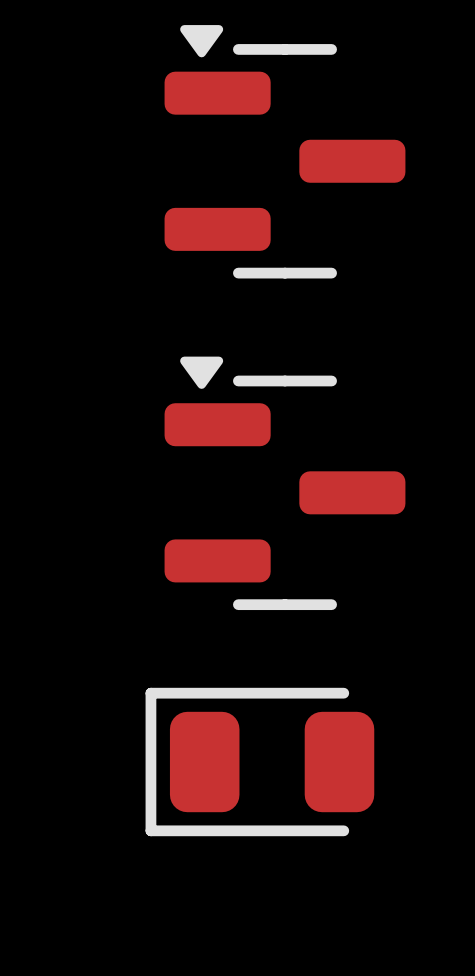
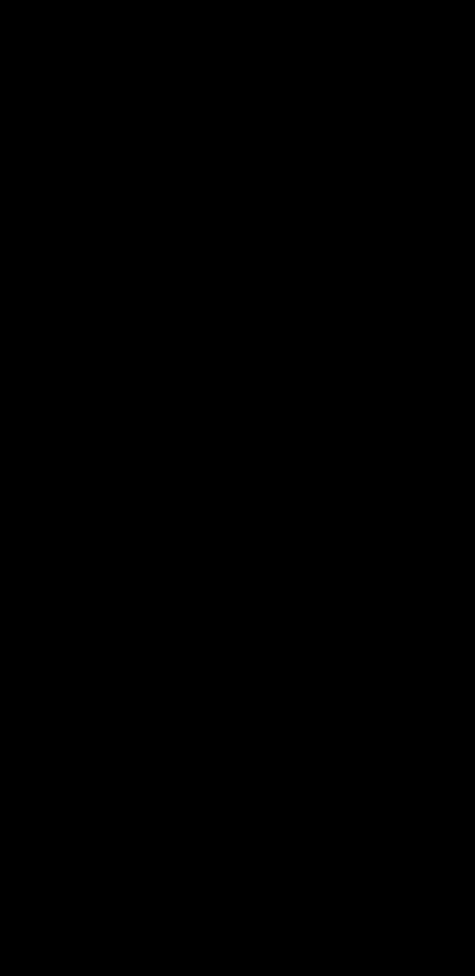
part: (285, 151) -> none
part: (285, 483) -> none
part: (259, 762) -> none

